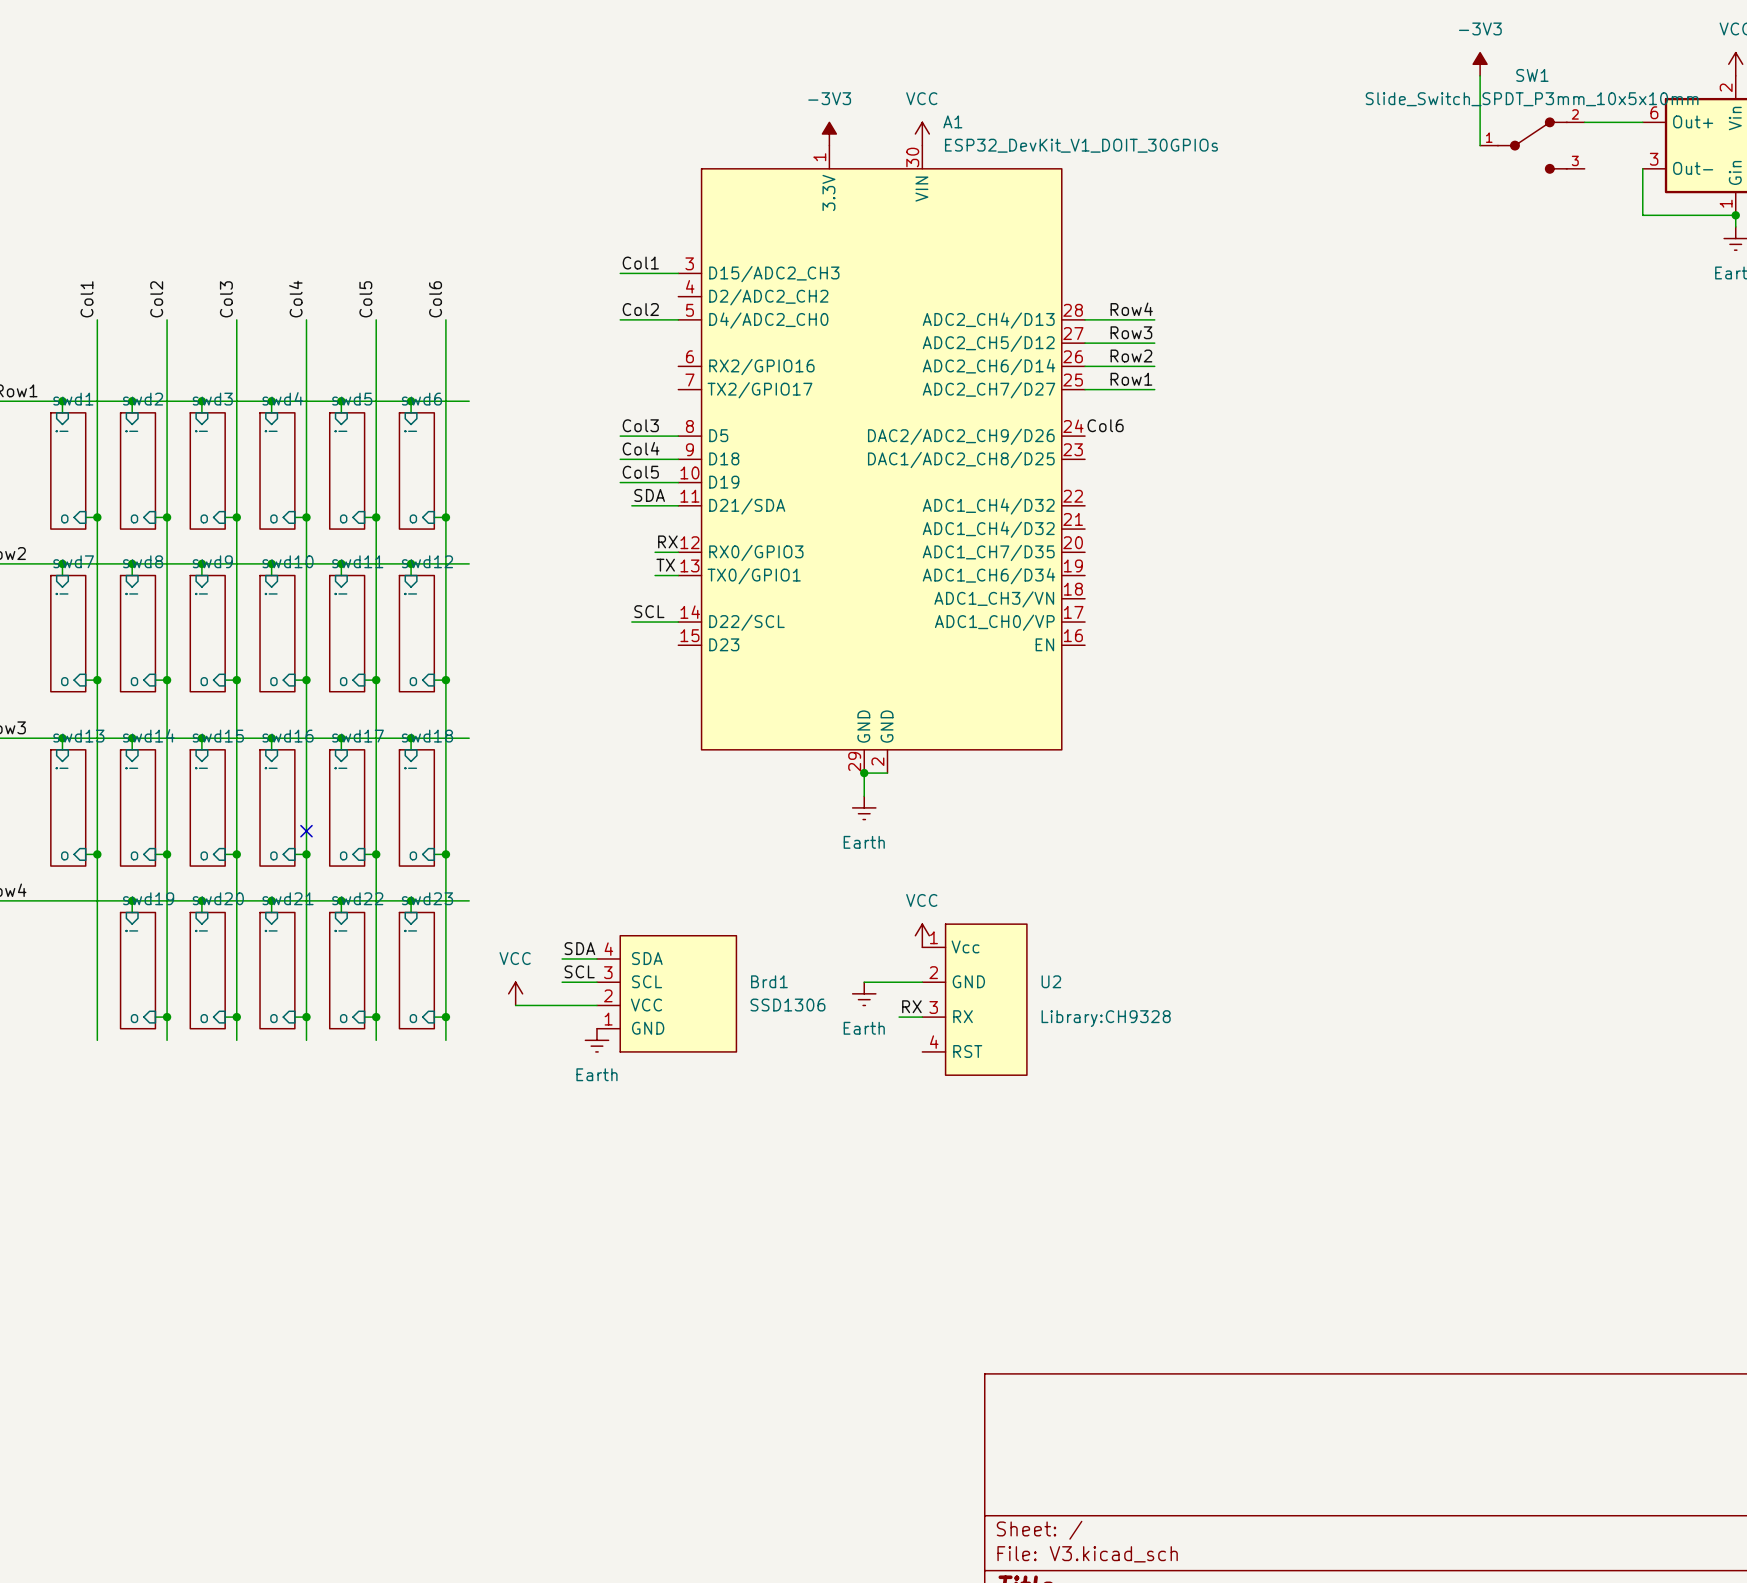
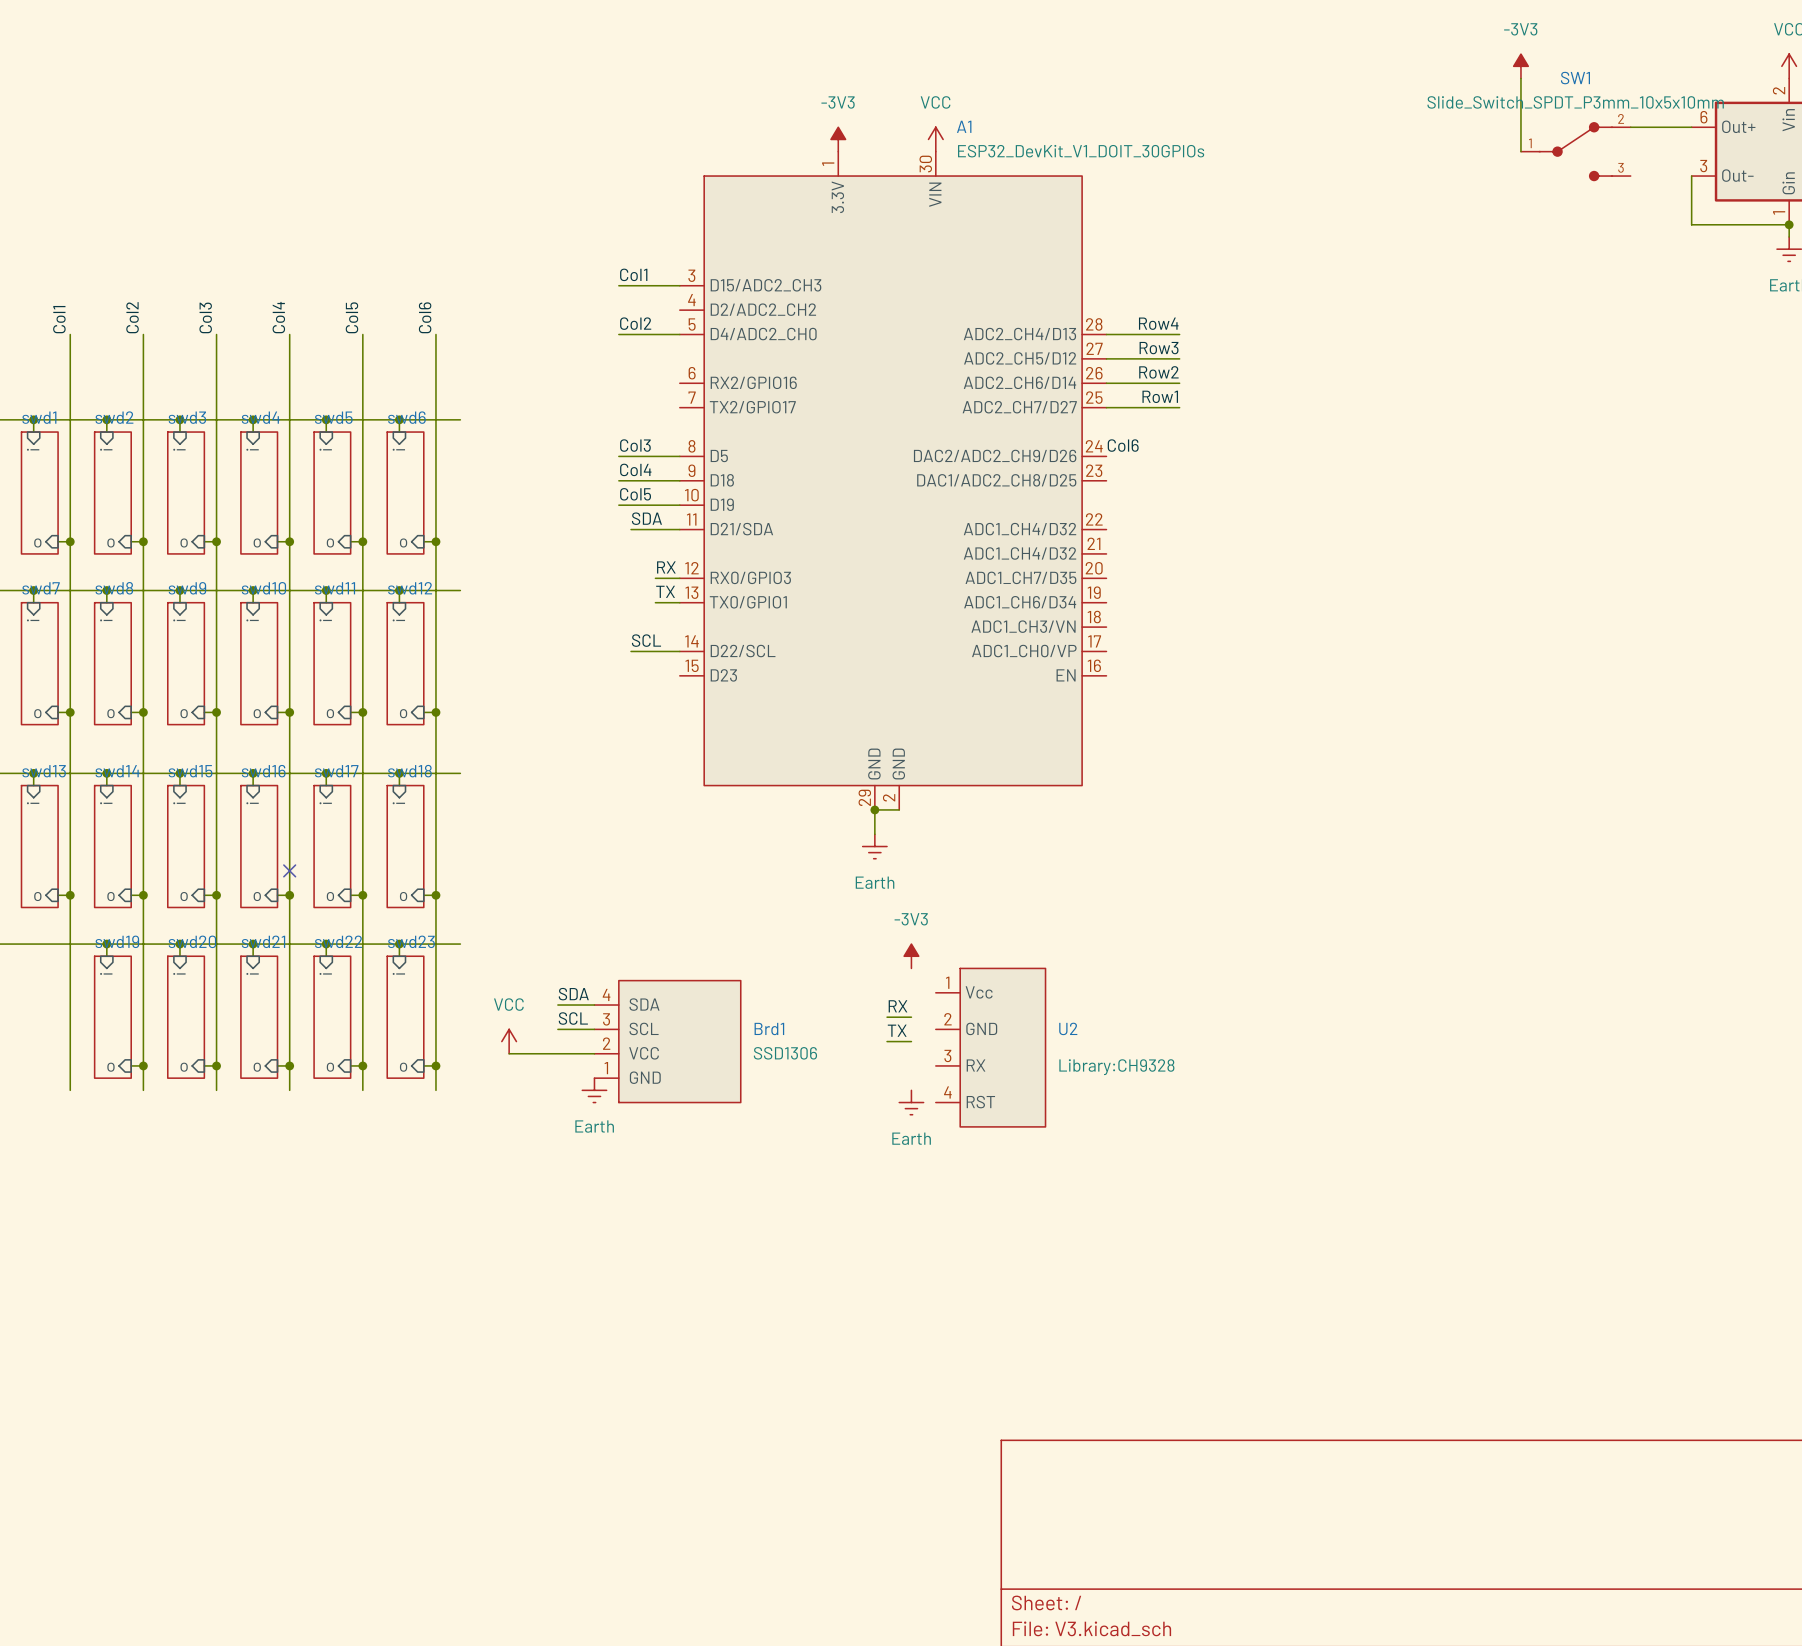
power symbol: none -> -3V3 (911, 956)
power symbol: VCC (922, 935) -> none
wire: none -> (887, 1017) (911, 1017)
wire: (864, 982) (922, 982) -> none
label: none -> TX (897, 1030)
power symbol position: Earth (864, 993) -> Earth (911, 1102)
label position: RX (911, 1006) -> RX (897, 1006)
wire: (899, 1017) (922, 1017) -> (887, 1041) (911, 1041)

